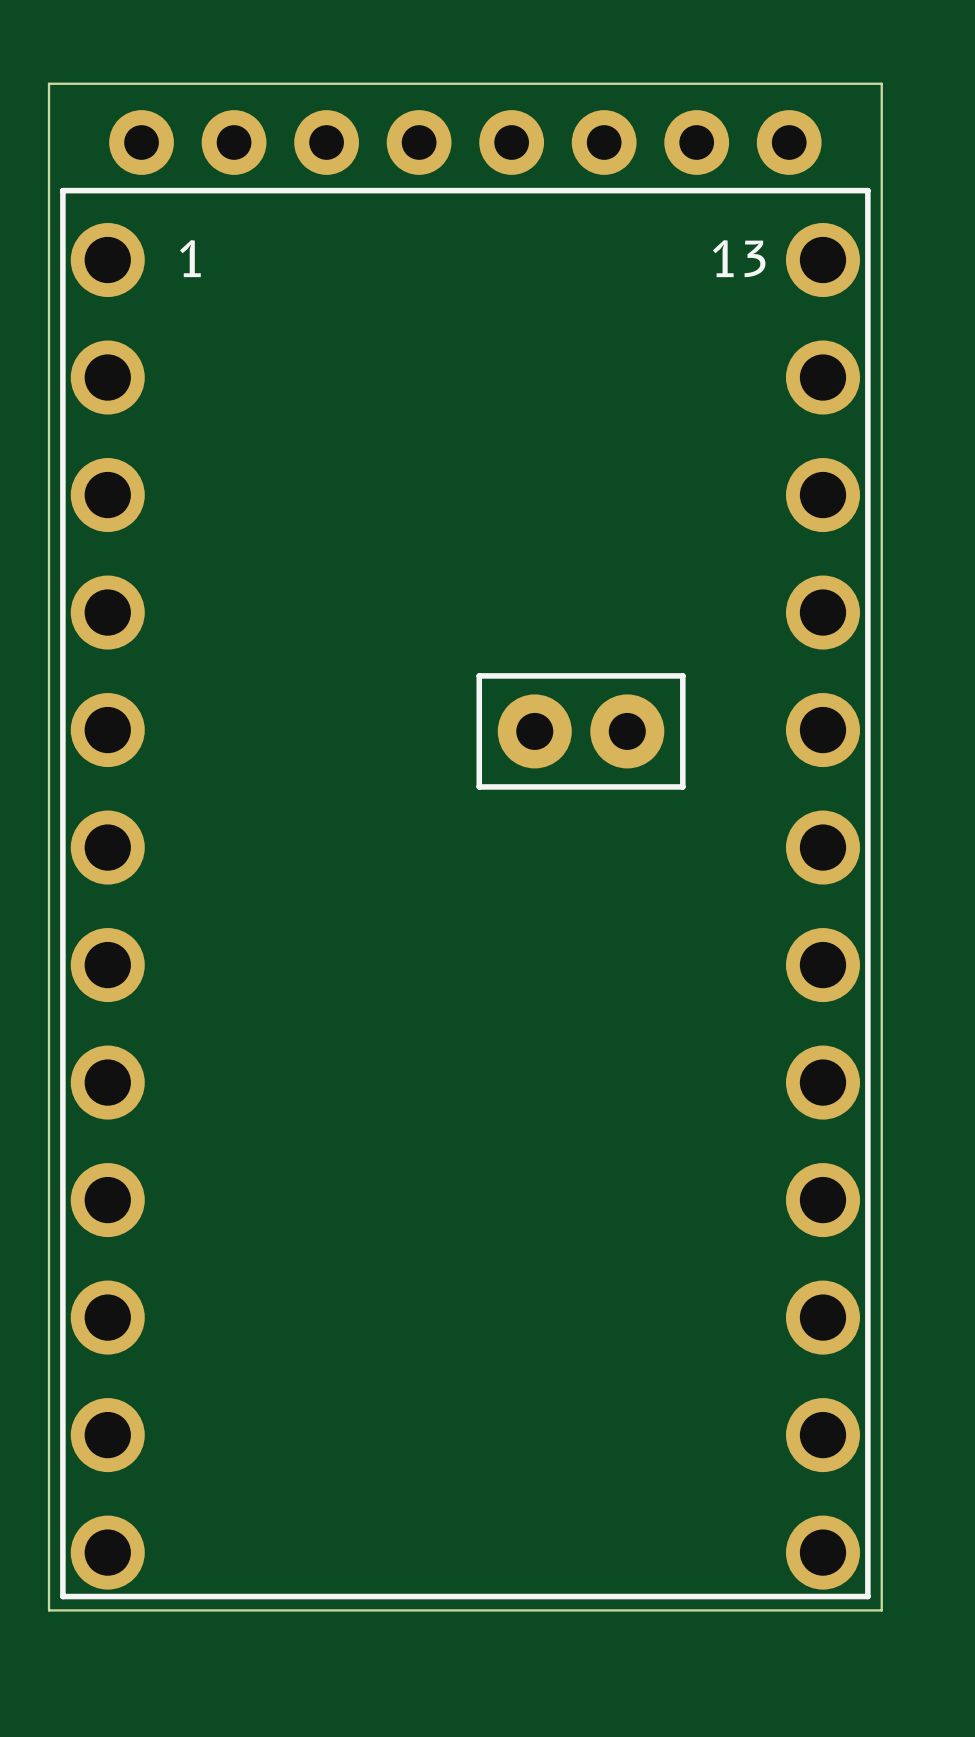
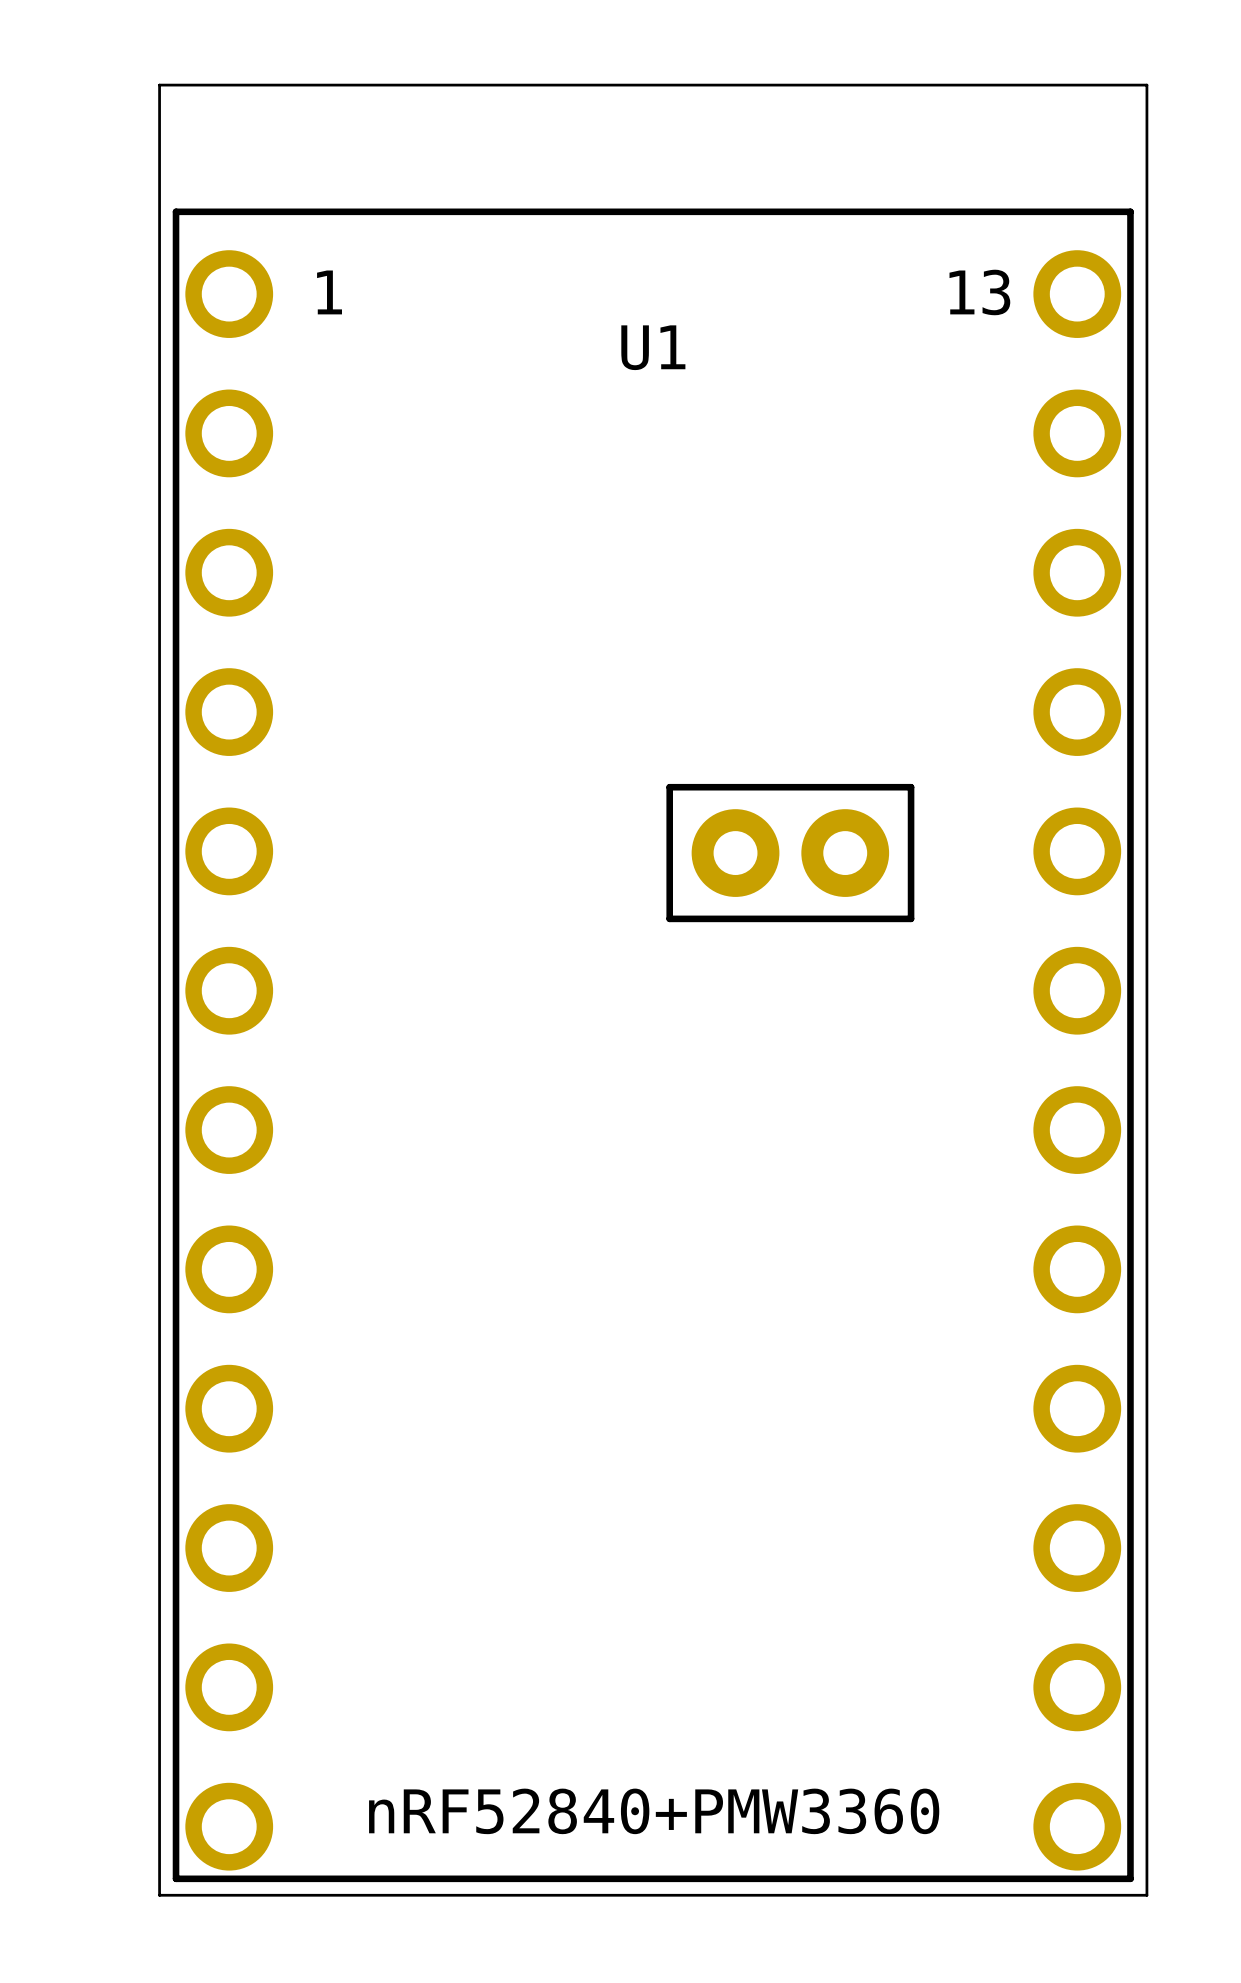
part: (465, 142) -> none
U1 name: none -> U1 (653, 347)
text: none -> nRF52840+PMW3360 (654, 1811)

